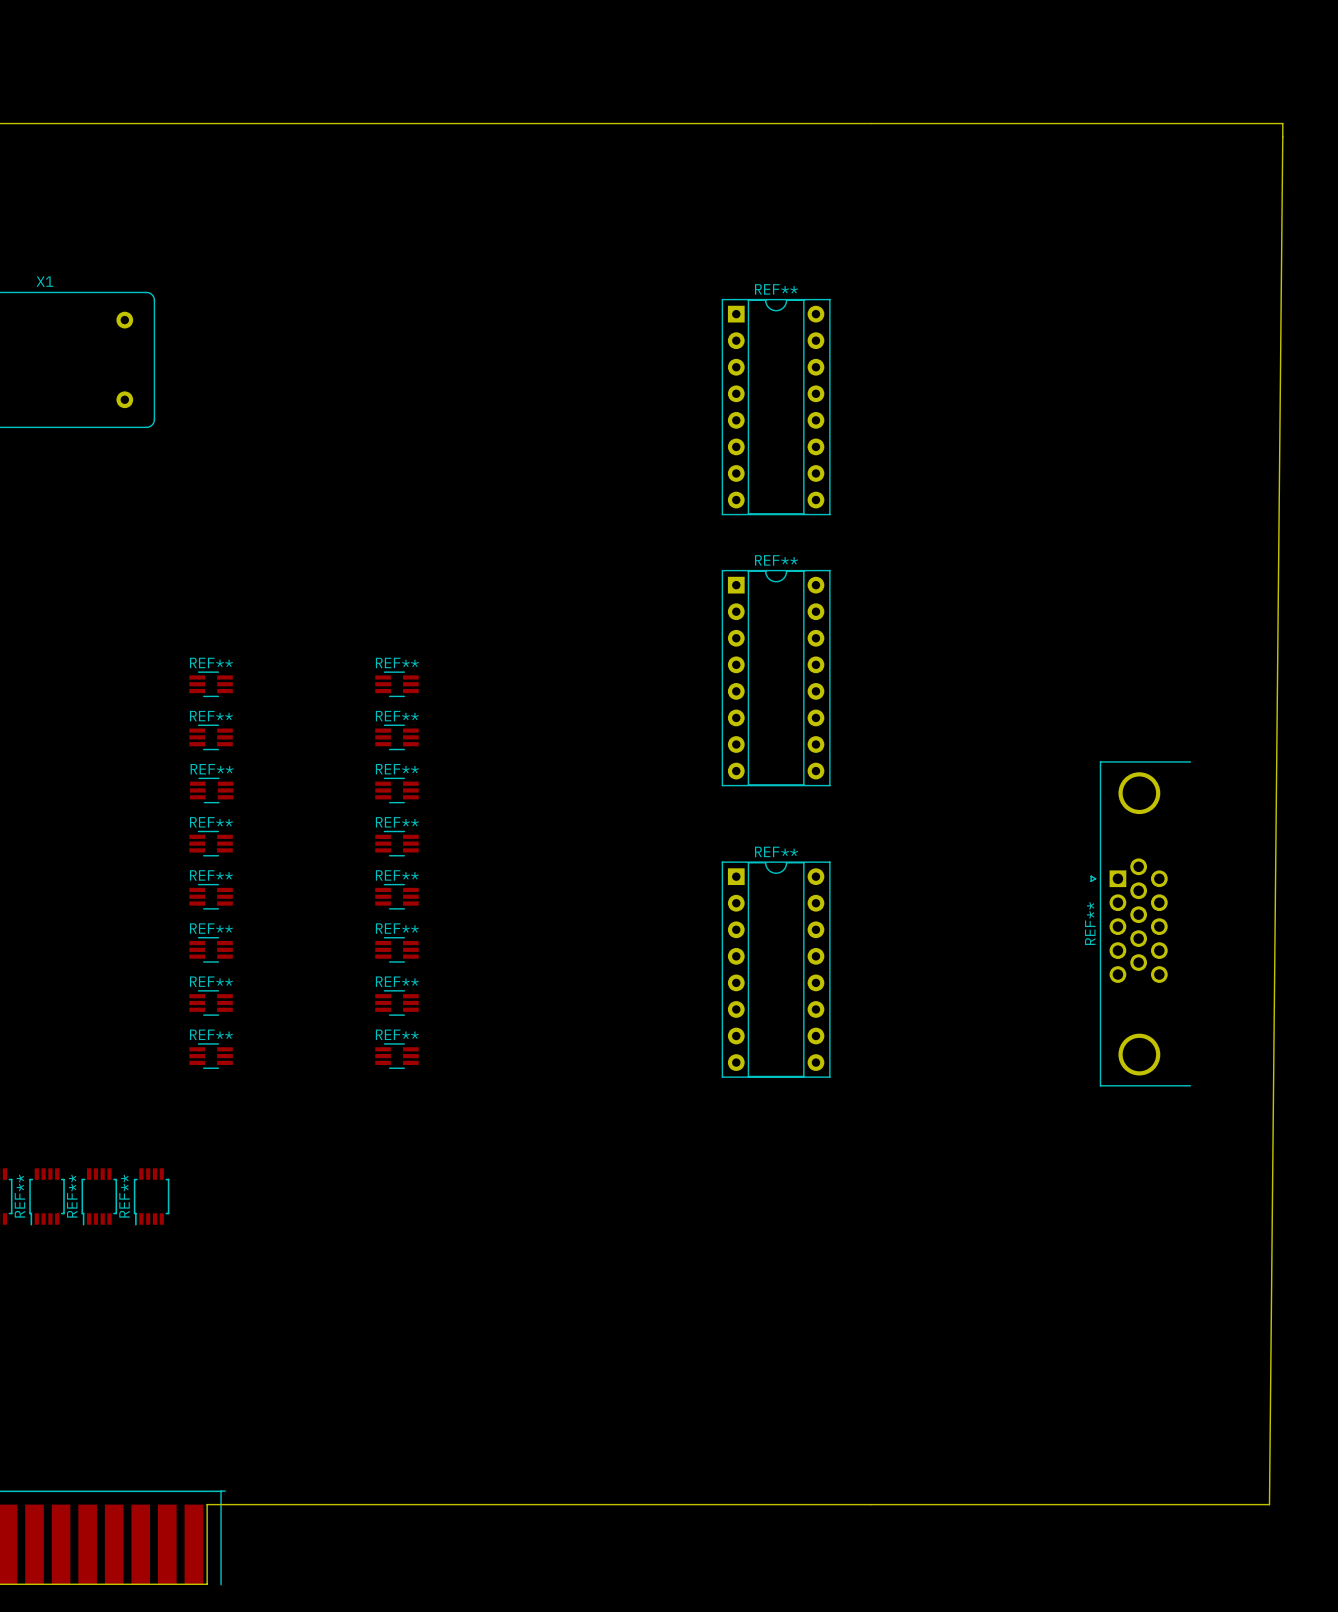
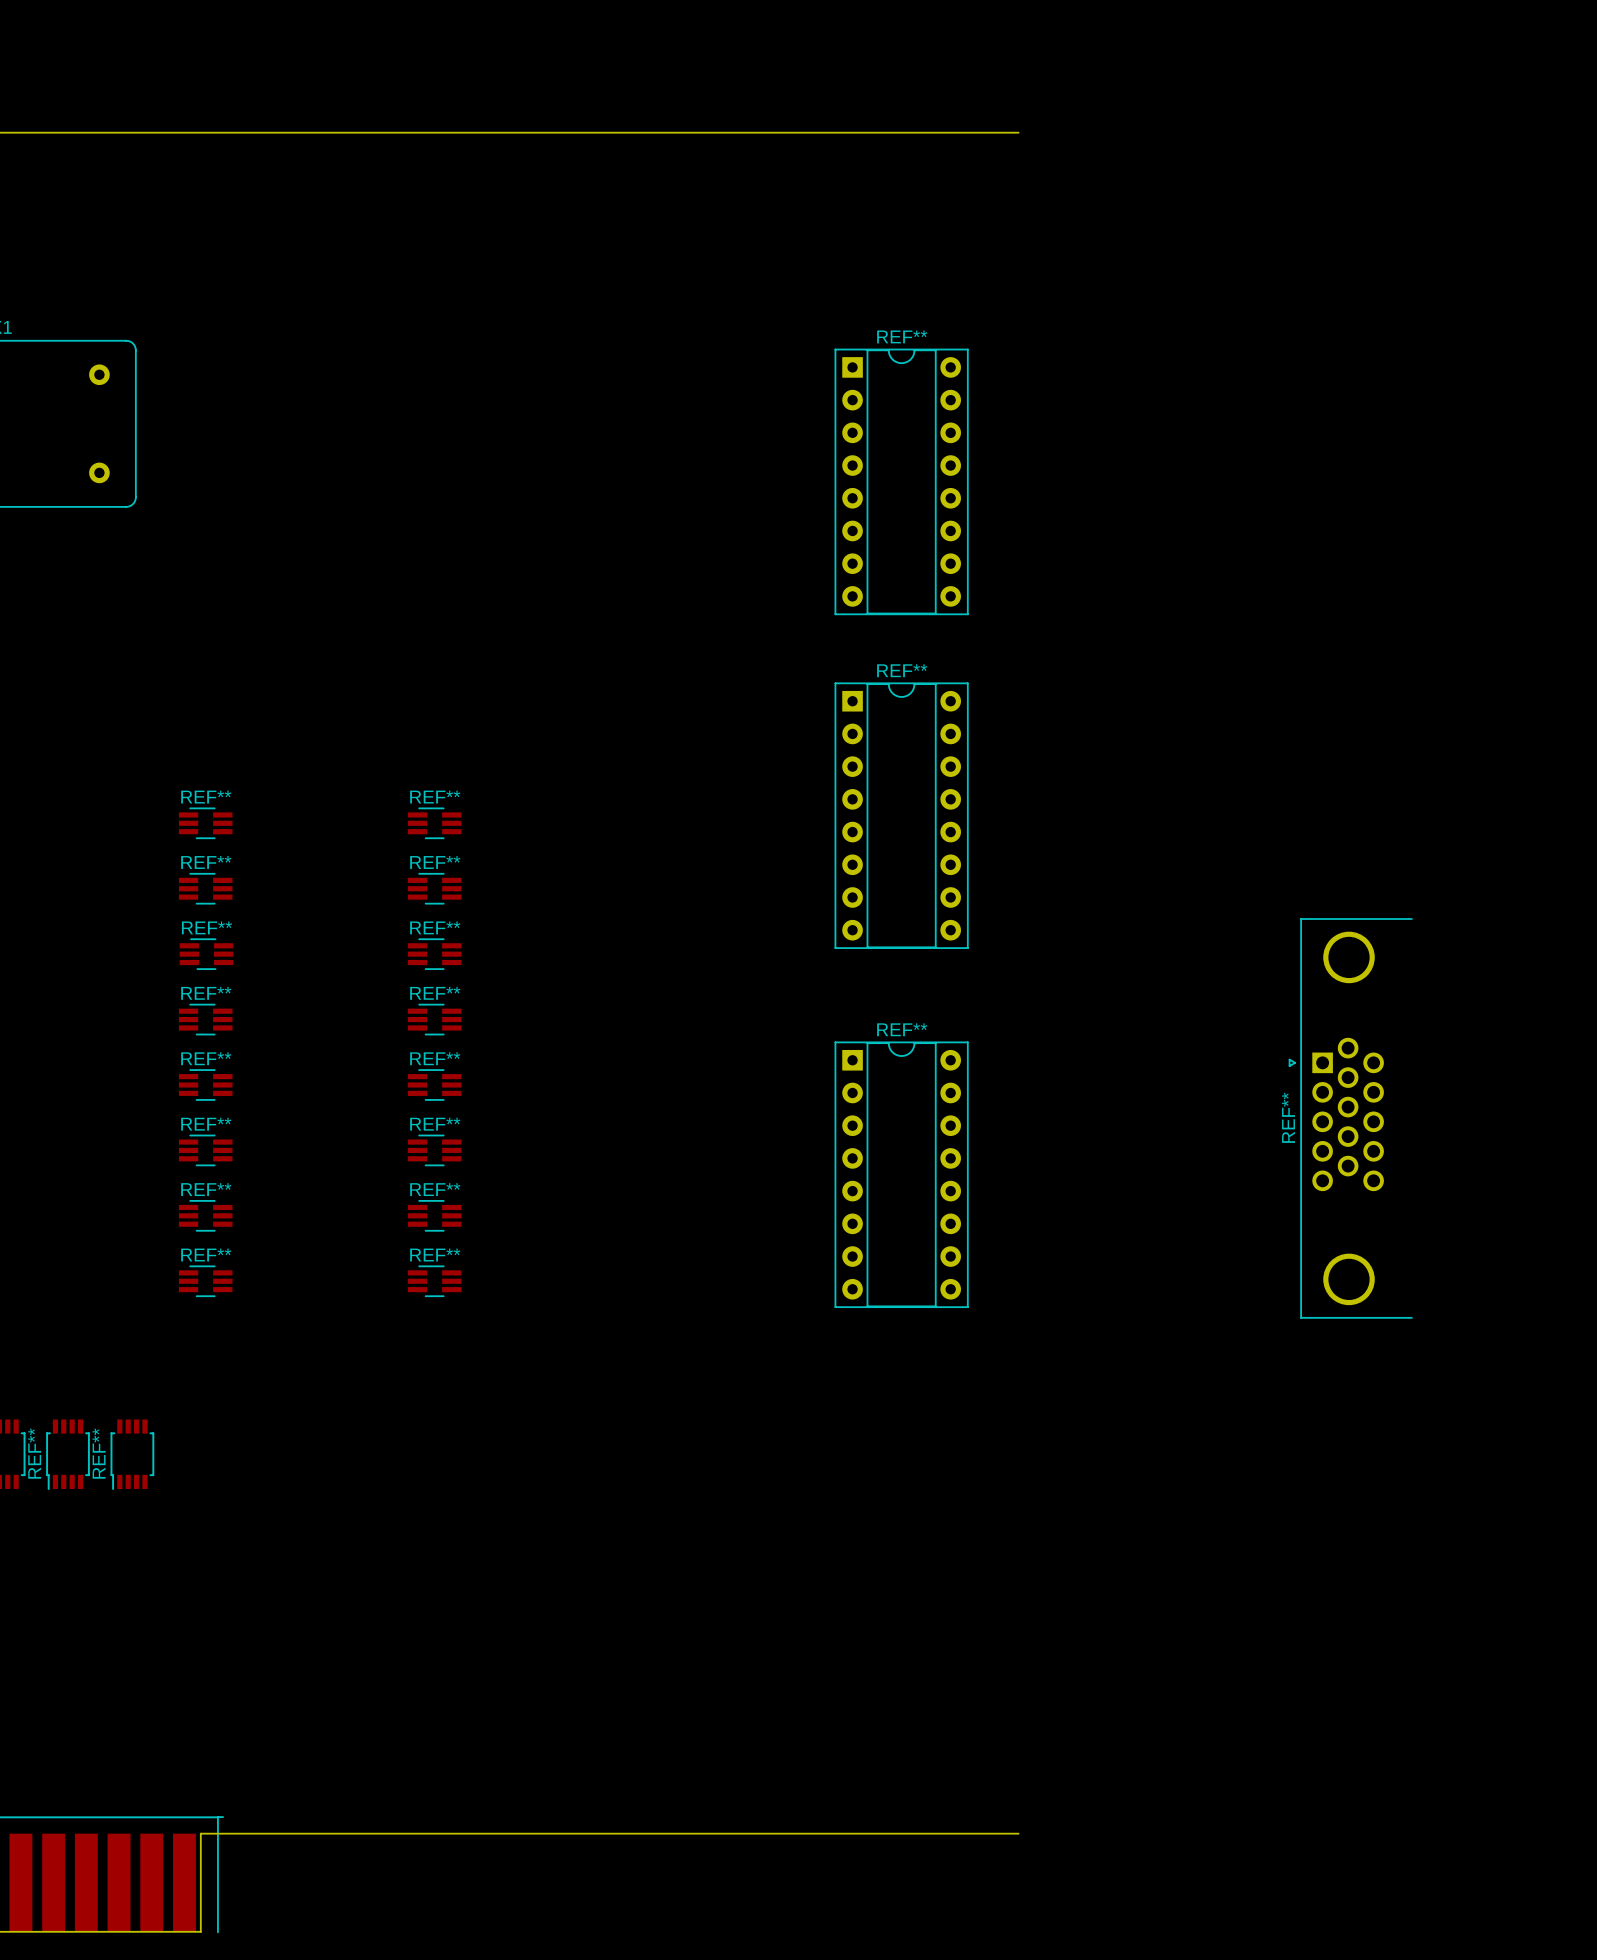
board edge: (871, 123) (1282, 123) (1269, 1504) (871, 1504) -> none

